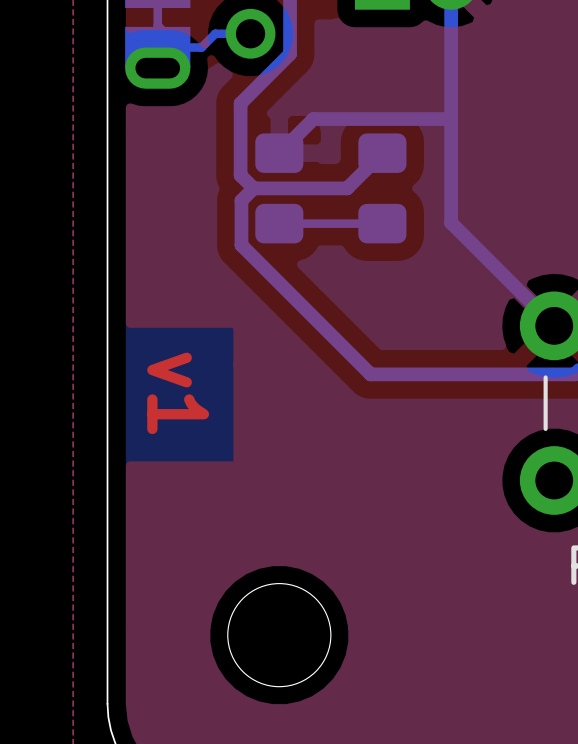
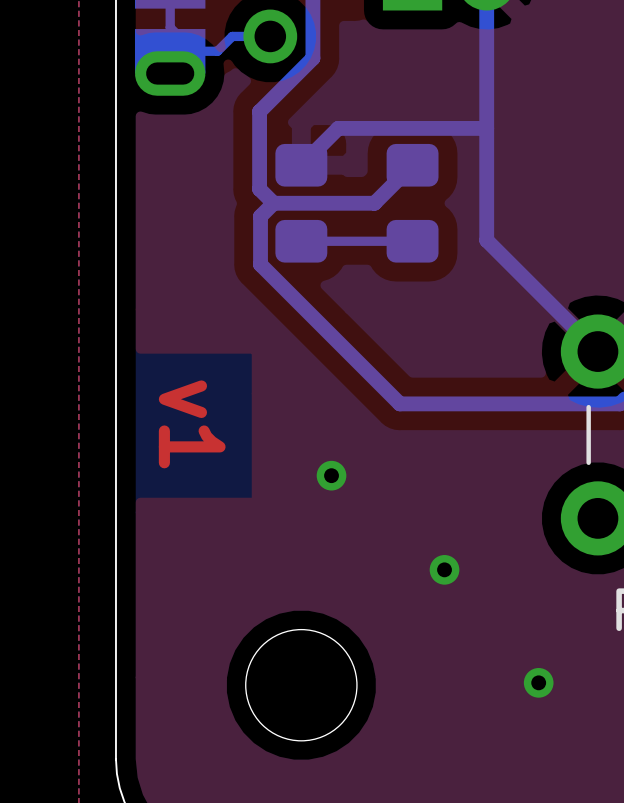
via: none -> (331, 475)
via: none -> (444, 569)
via: none -> (538, 682)

